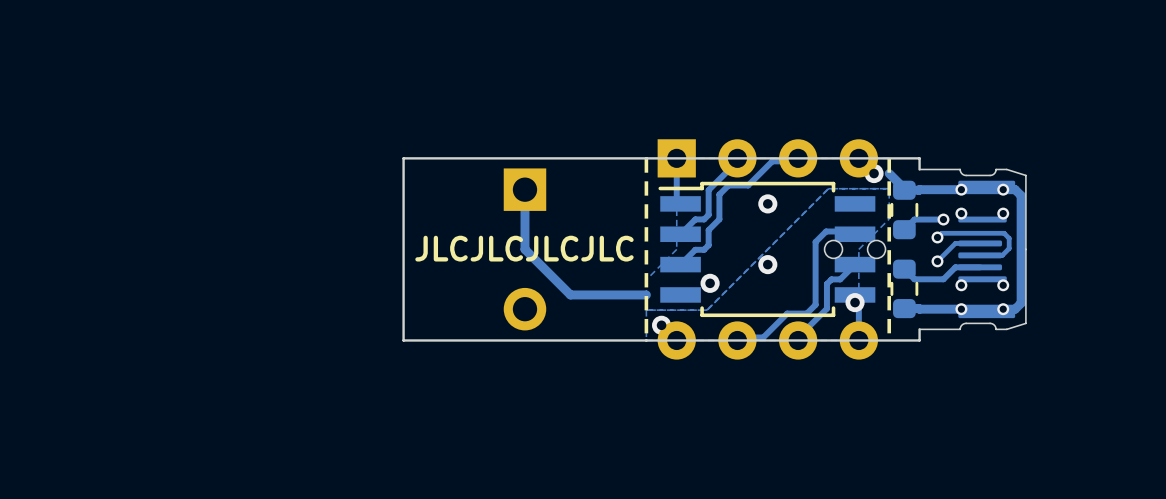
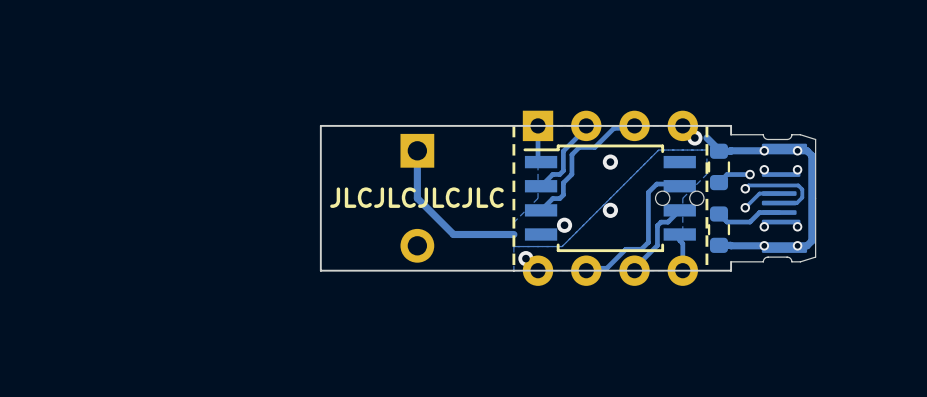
via: (855, 302) -> none

